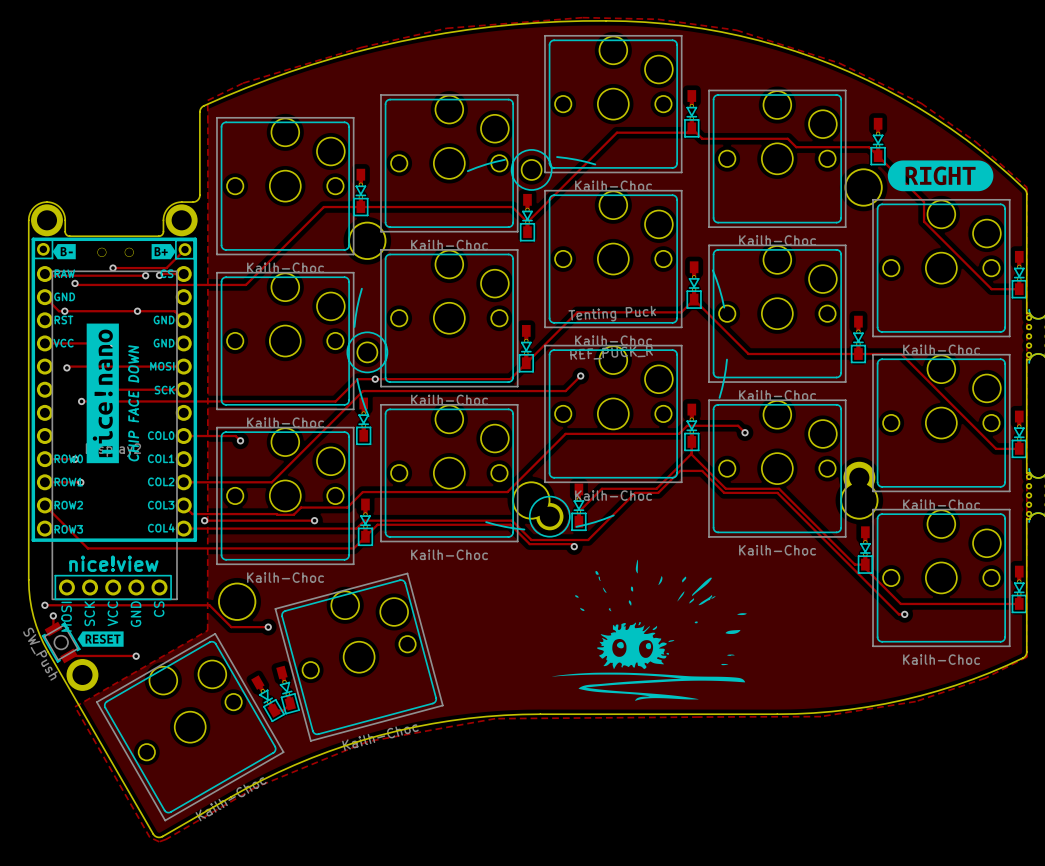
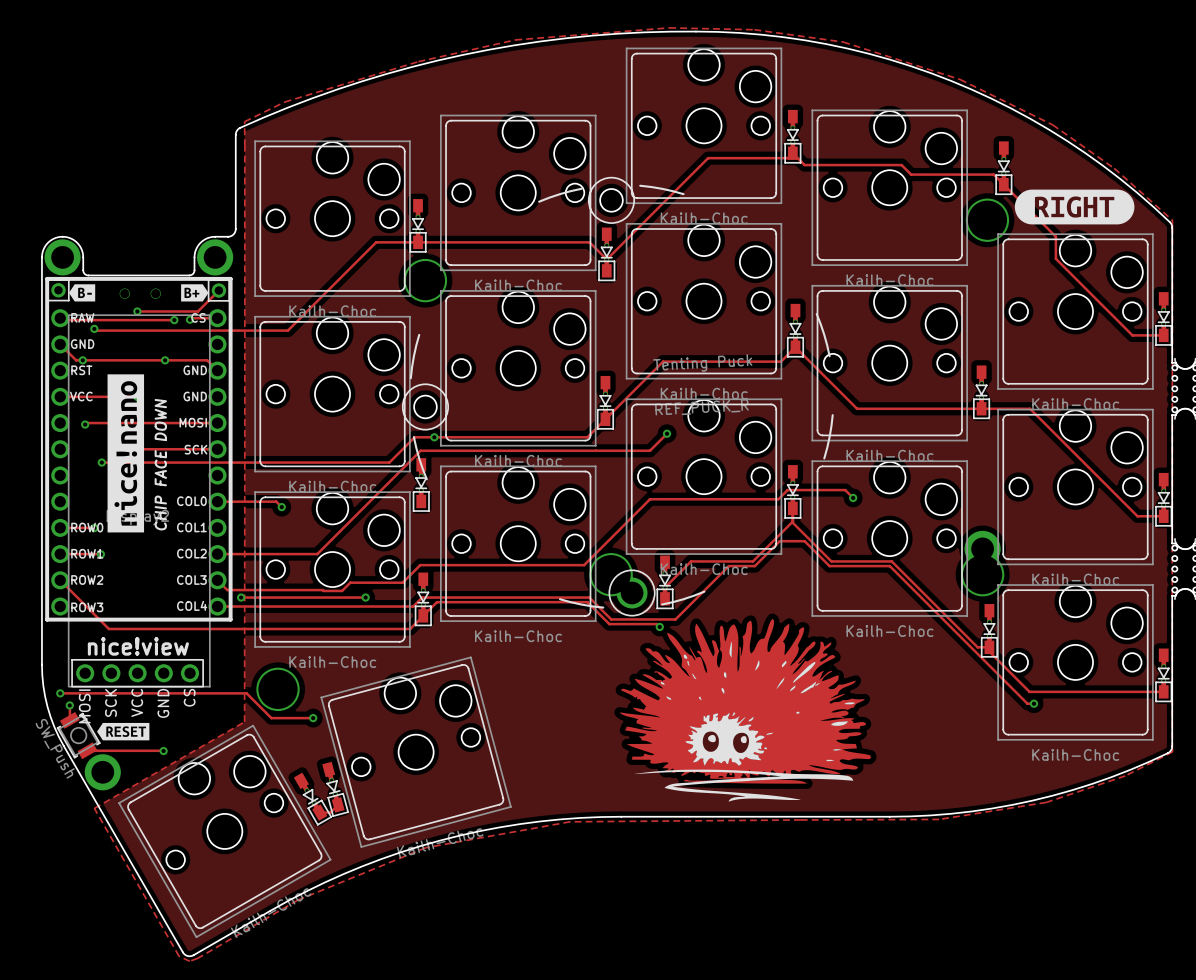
drawing: none -> [619, 618, 872, 784]

